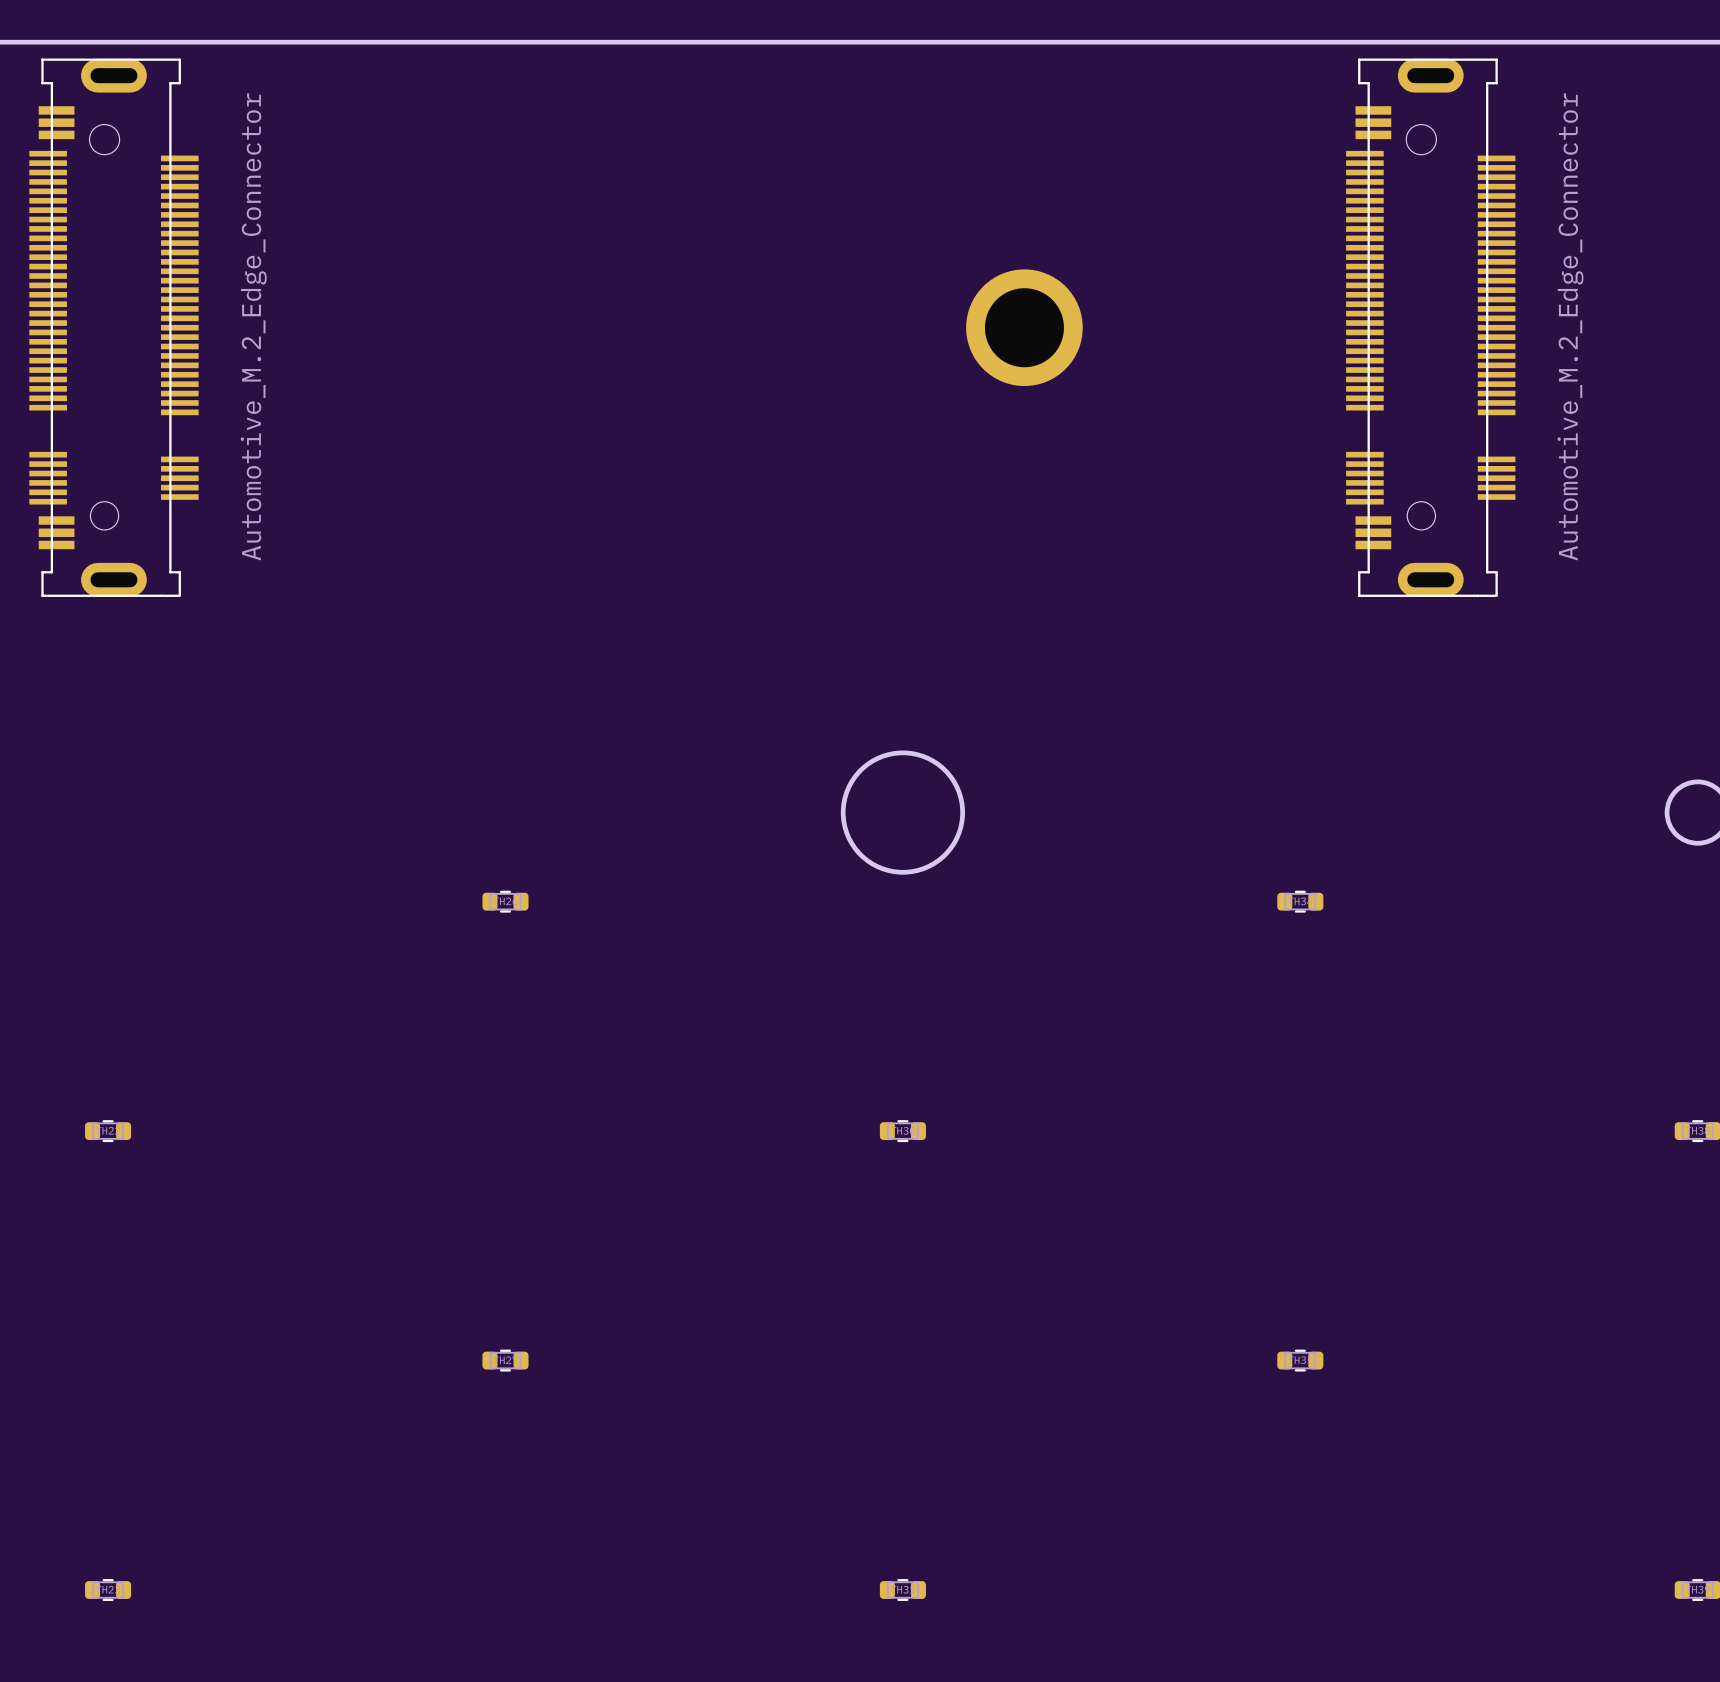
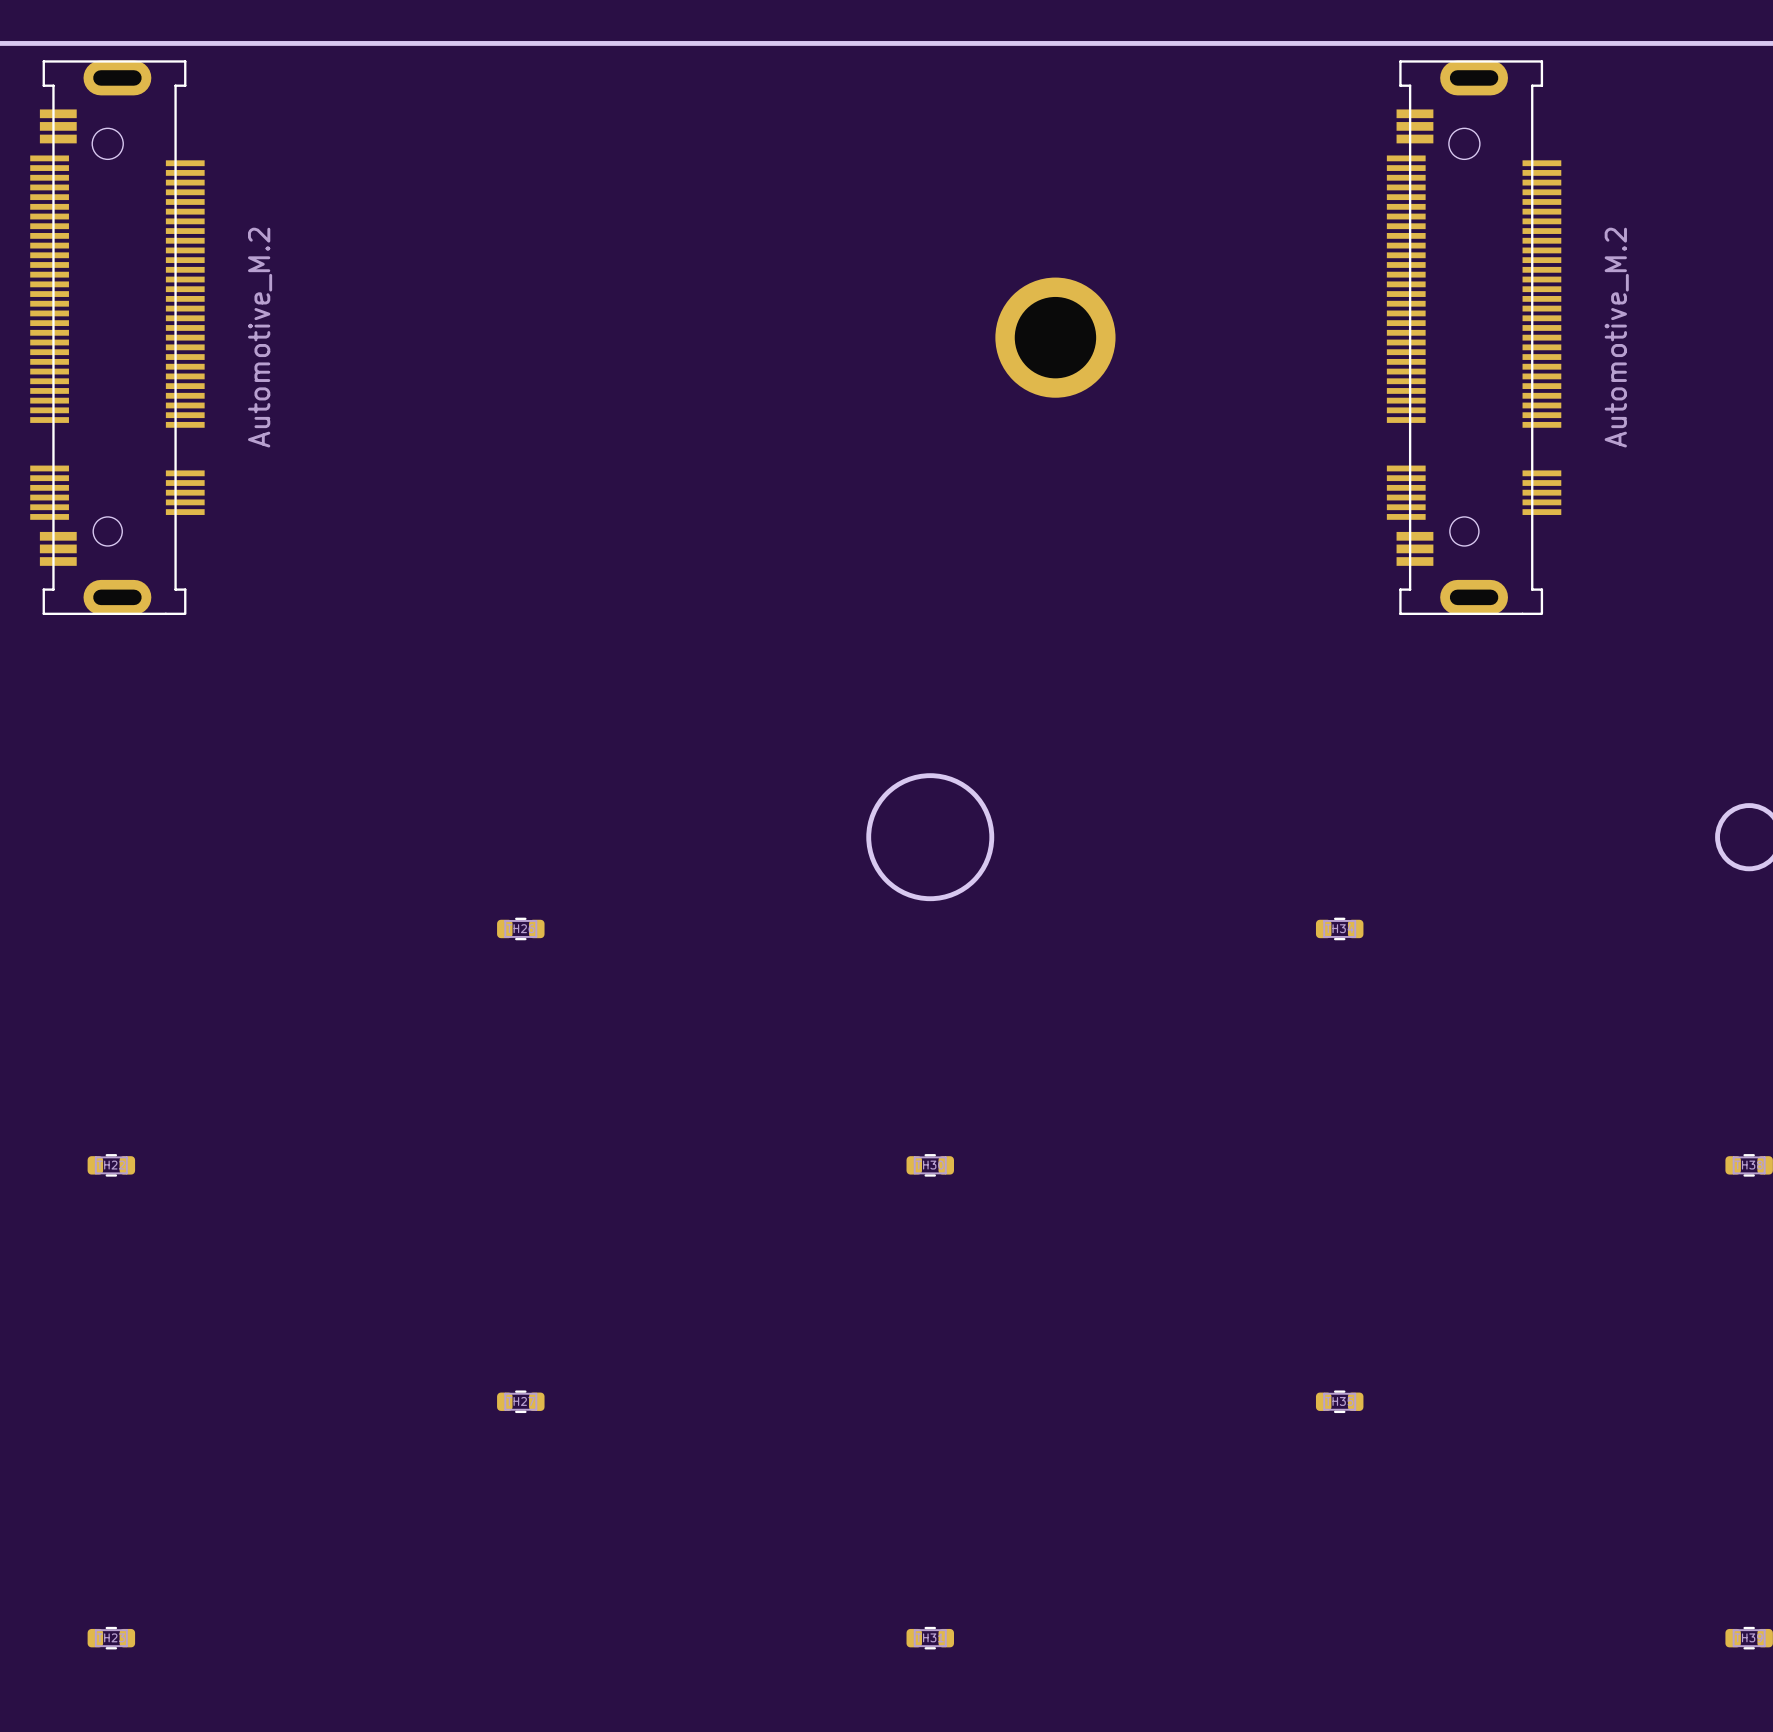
part value: Automotive_M.2_Edge_Connector (253, 326) -> Automotive_M.2 (260, 337)
part value: Automotive_M.2_Edge_Connector (1570, 326) -> Automotive_M.2 (1616, 337)

